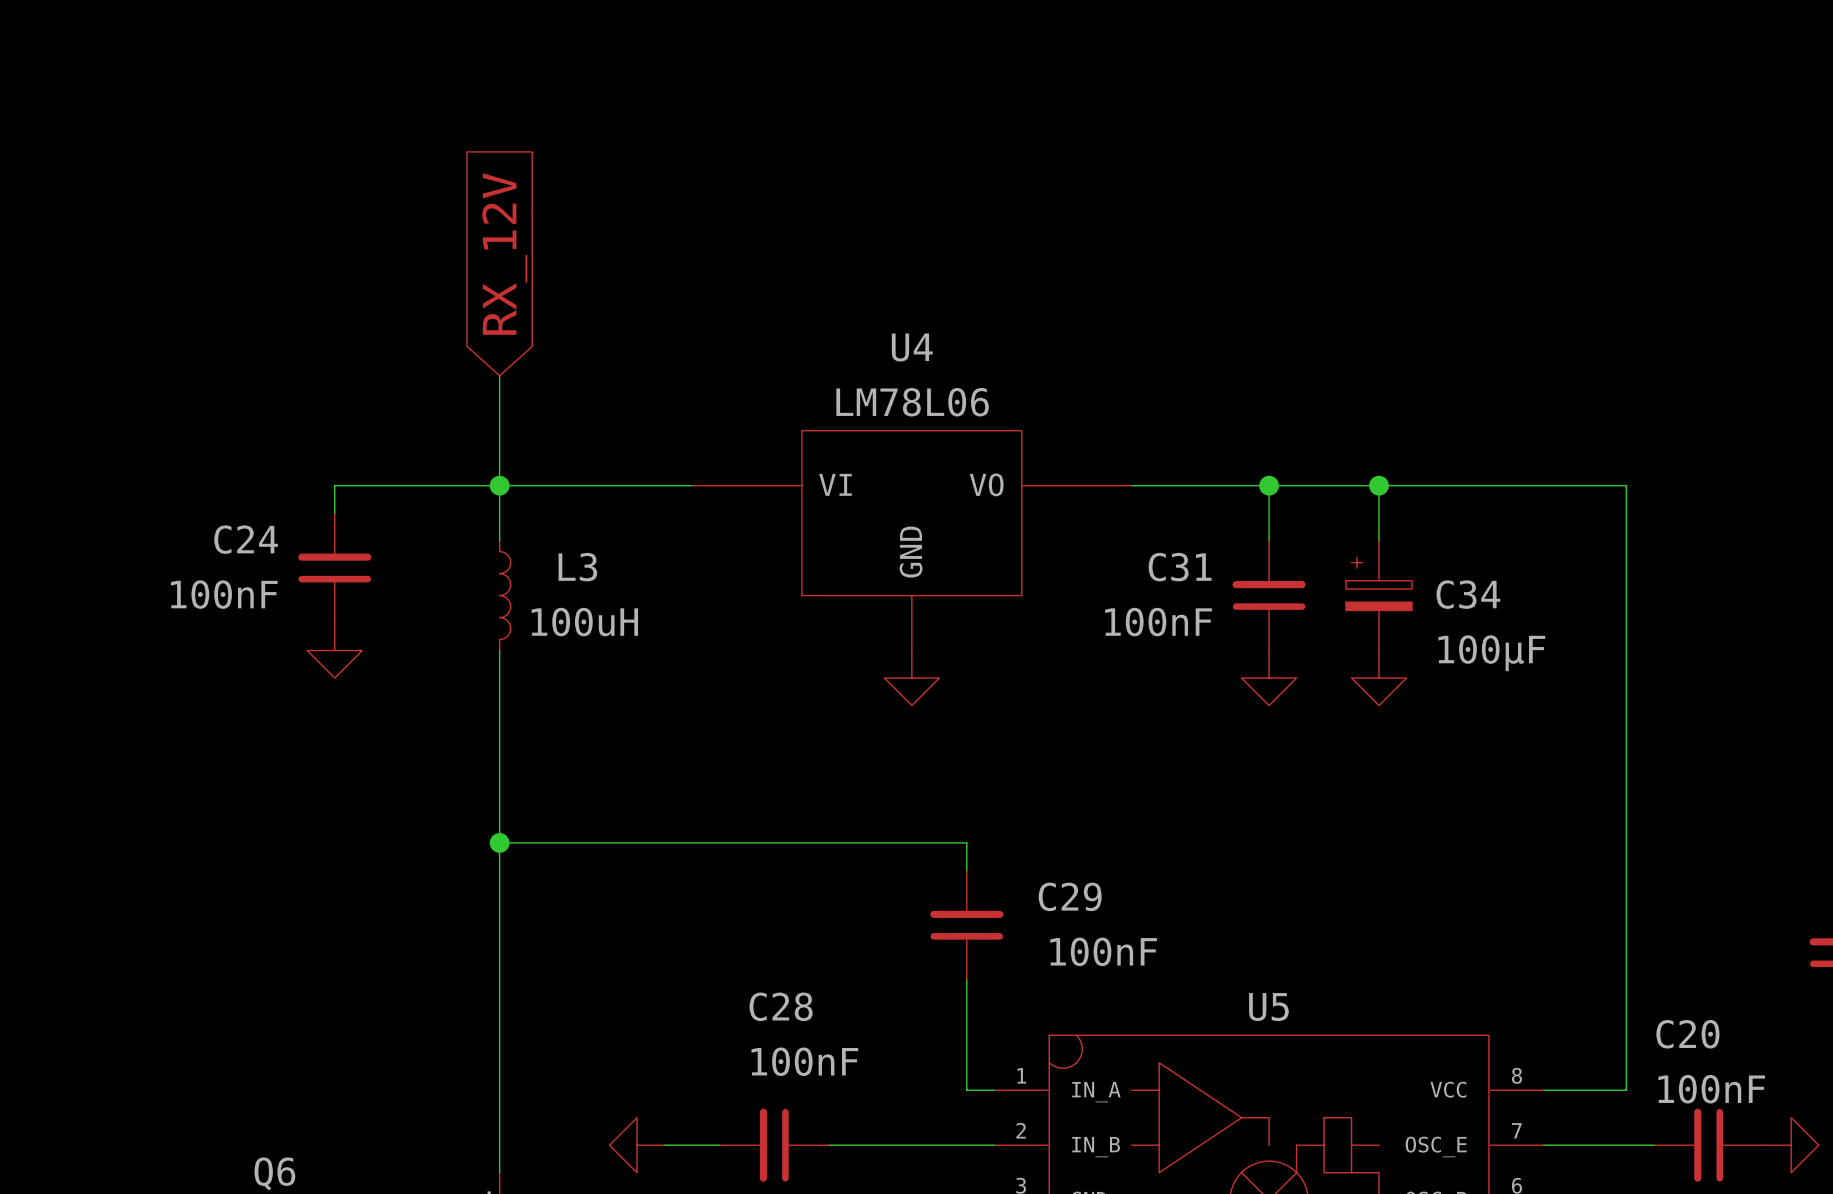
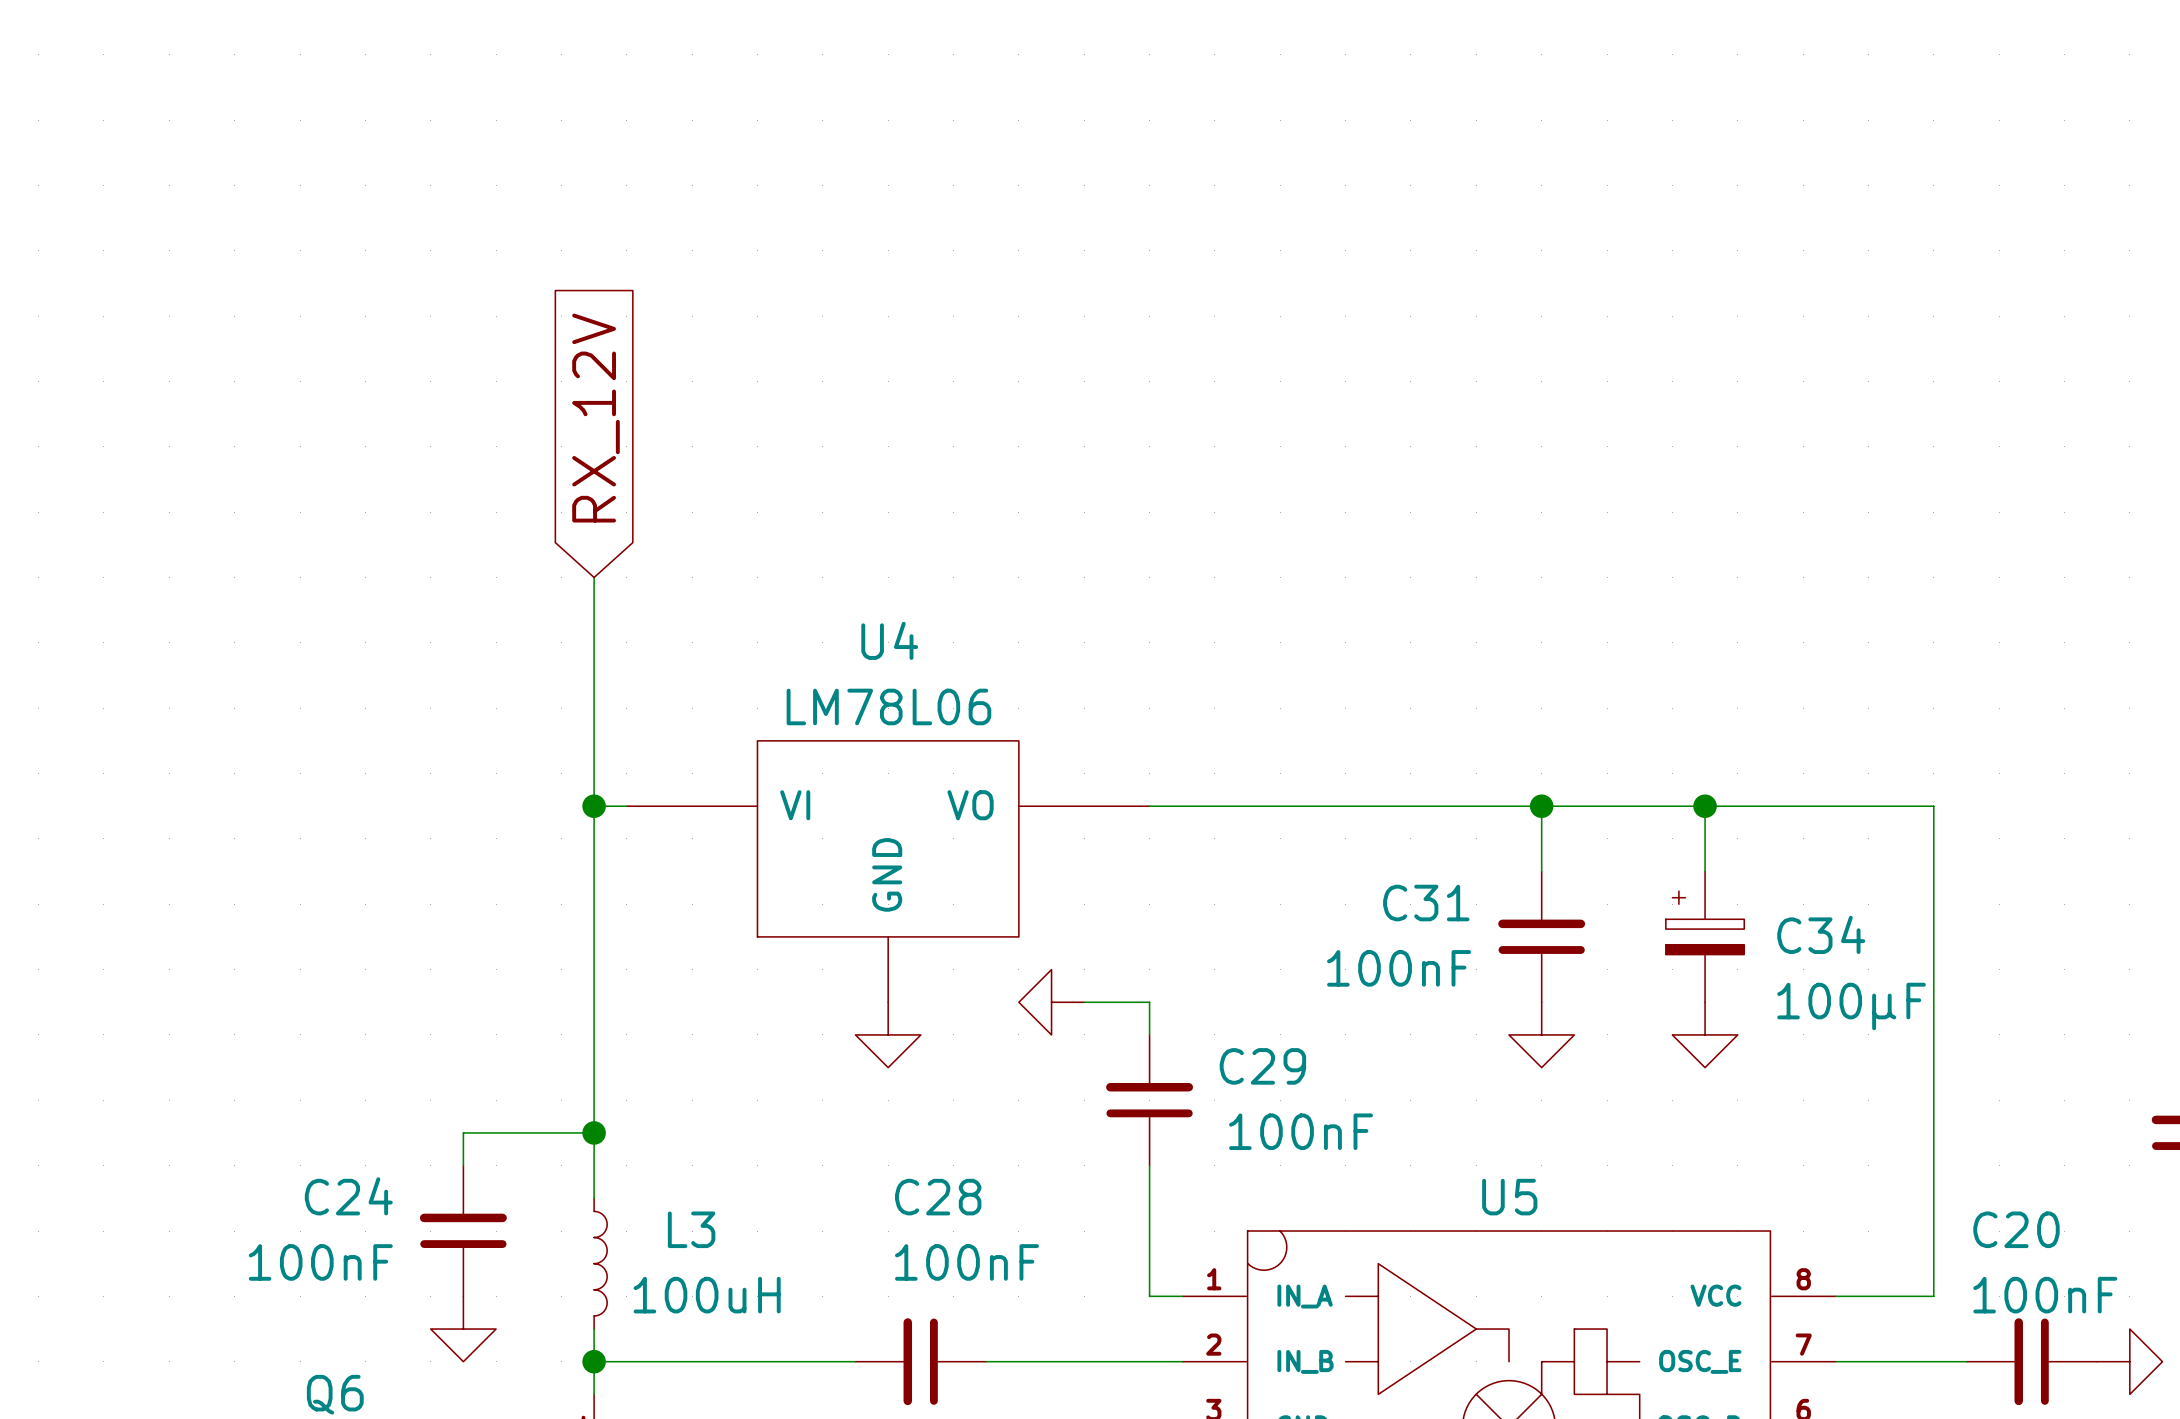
global label position: RX_12V (504, 254) -> RX_12V (595, 418)
wire: (499, 375) (499, 485) -> (594, 642) (594, 773)
junction: (499, 485) -> none
wire: (692, 485) (334, 485) (334, 513) -> none
wire: (1131, 485) (1626, 485) (1626, 678) -> (1149, 806) (1933, 806)
wire: (1269, 485) (1269, 540) -> (1541, 806) (1541, 871)
junction: (1269, 485) -> none
wire: (1379, 485) (1379, 540) -> (1705, 806) (1705, 871)
junction: (1379, 485) -> none
U4 position: (911, 540) -> (888, 871)
C24 position: (334, 568) -> (463, 1231)
L3 position: (505, 595) -> (600, 1263)
C31 position: (1269, 595) -> (1541, 936)
C34 position: (1379, 595) -> (1705, 936)
power symbol: (334, 650) -> none
wire: none -> (594, 806) (626, 806)
junction: none -> (594, 806)
power symbol: (911, 678) -> none
power symbol: (1269, 678) -> none
junction: none -> (1541, 806)
power symbol: (1379, 678) -> none
junction: none -> (1705, 806)
wire: (499, 842) (911, 842) -> none
junction: (499, 842) -> none
power symbol: none -> (1051, 1002)
power symbol: none -> (888, 1034)
power symbol: none -> (1541, 1034)
power symbol: none -> (1705, 1034)
wire: none -> (594, 1132) (463, 1132) (463, 1165)
junction: none -> (594, 1132)
wire: (499, 1007) (499, 1117) -> none
power symbol: none -> (463, 1329)
wire: none -> (594, 1361) (790, 1361)
junction: none -> (594, 1361)
power symbol: (637, 1145) -> none

